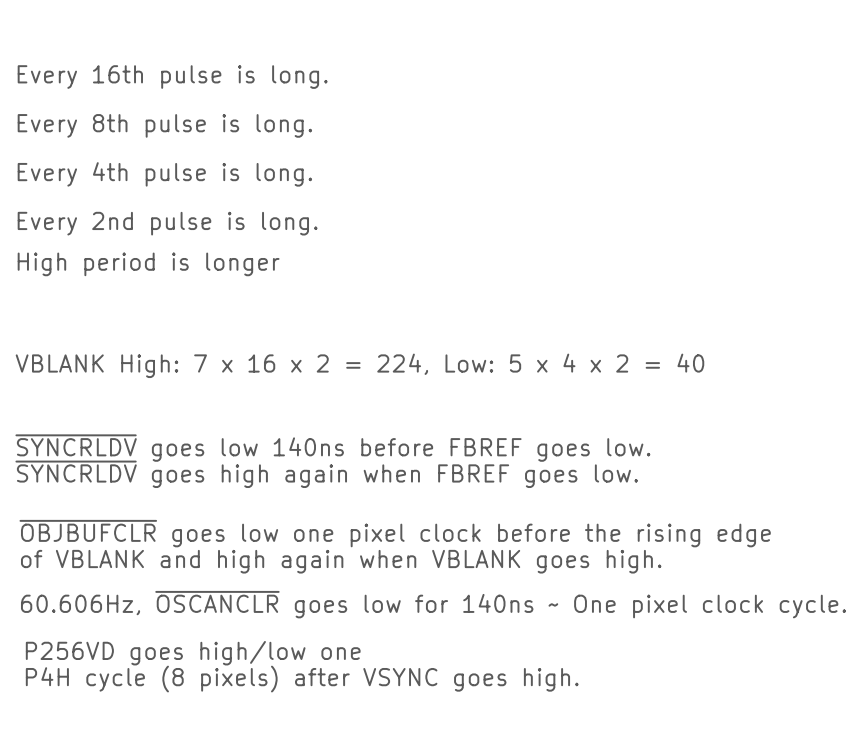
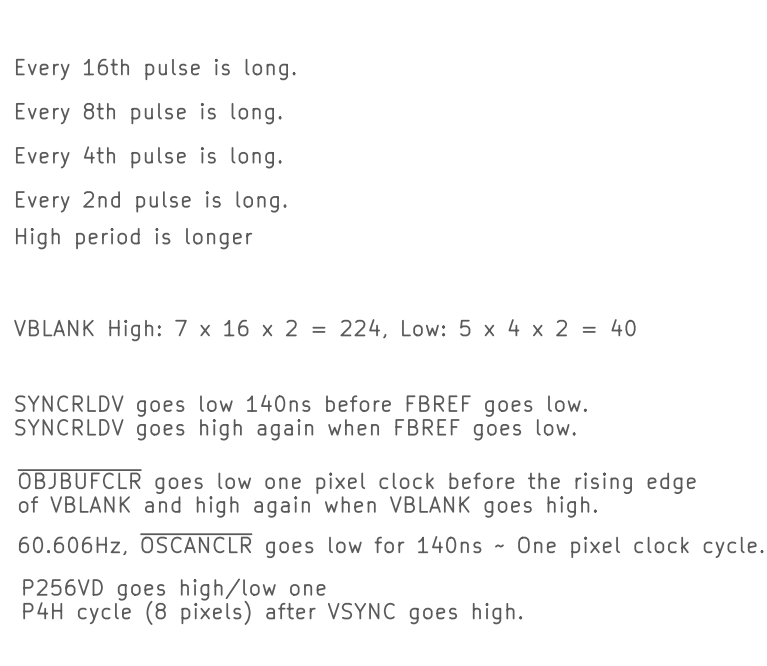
text: ~{SYNCRLDV} goes low 140ns before FBREF goes low. (332, 448) -> SYNCRLDV goes low 140ns before FBREF goes low. (301, 405)
text: ~{SYNCRLDV} goes high again when FBREF goes low. (326, 474) -> SYNCRLDV goes high again when FBREF goes low. (295, 429)

